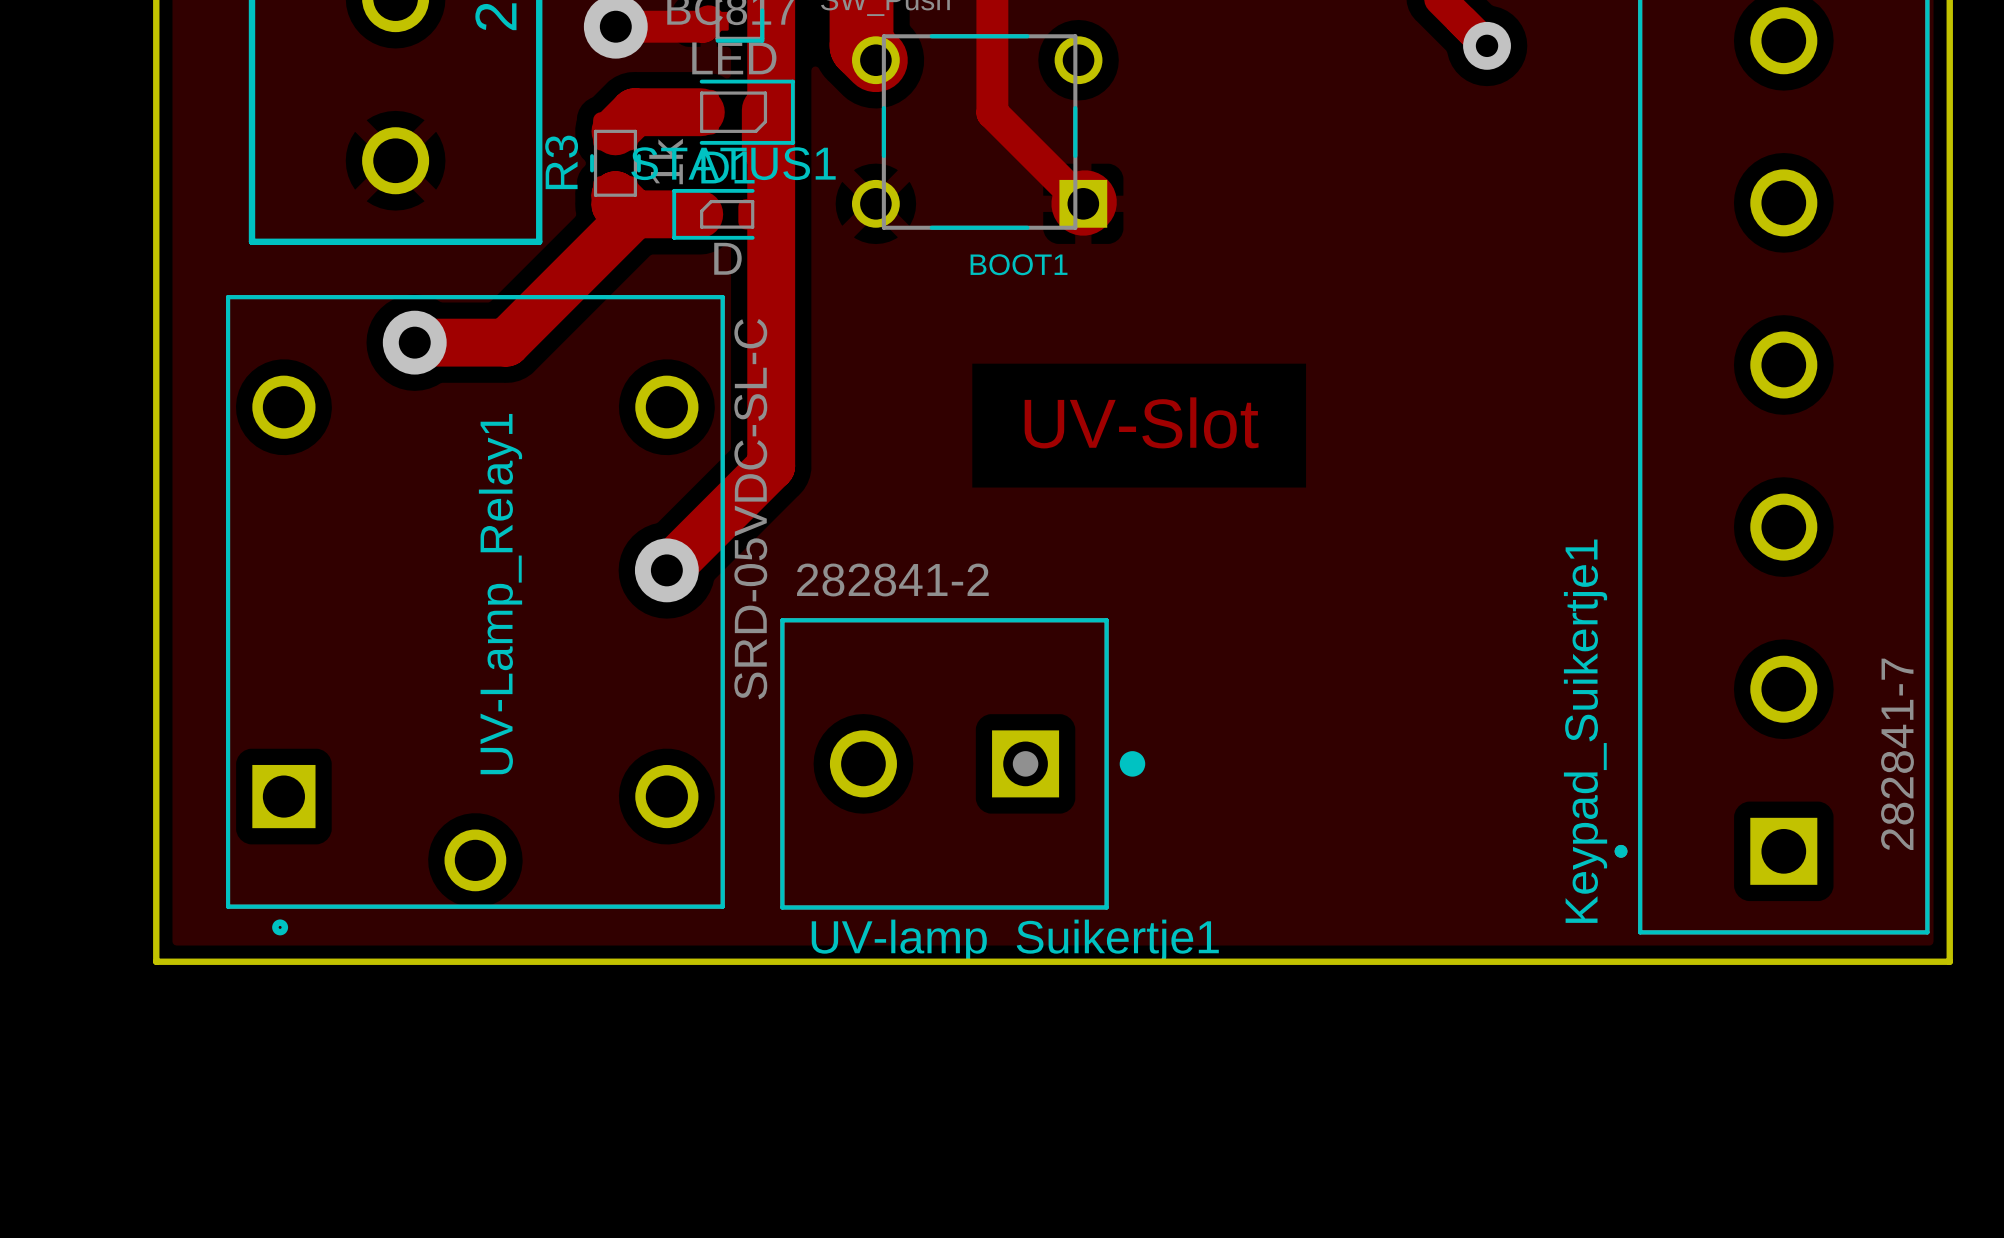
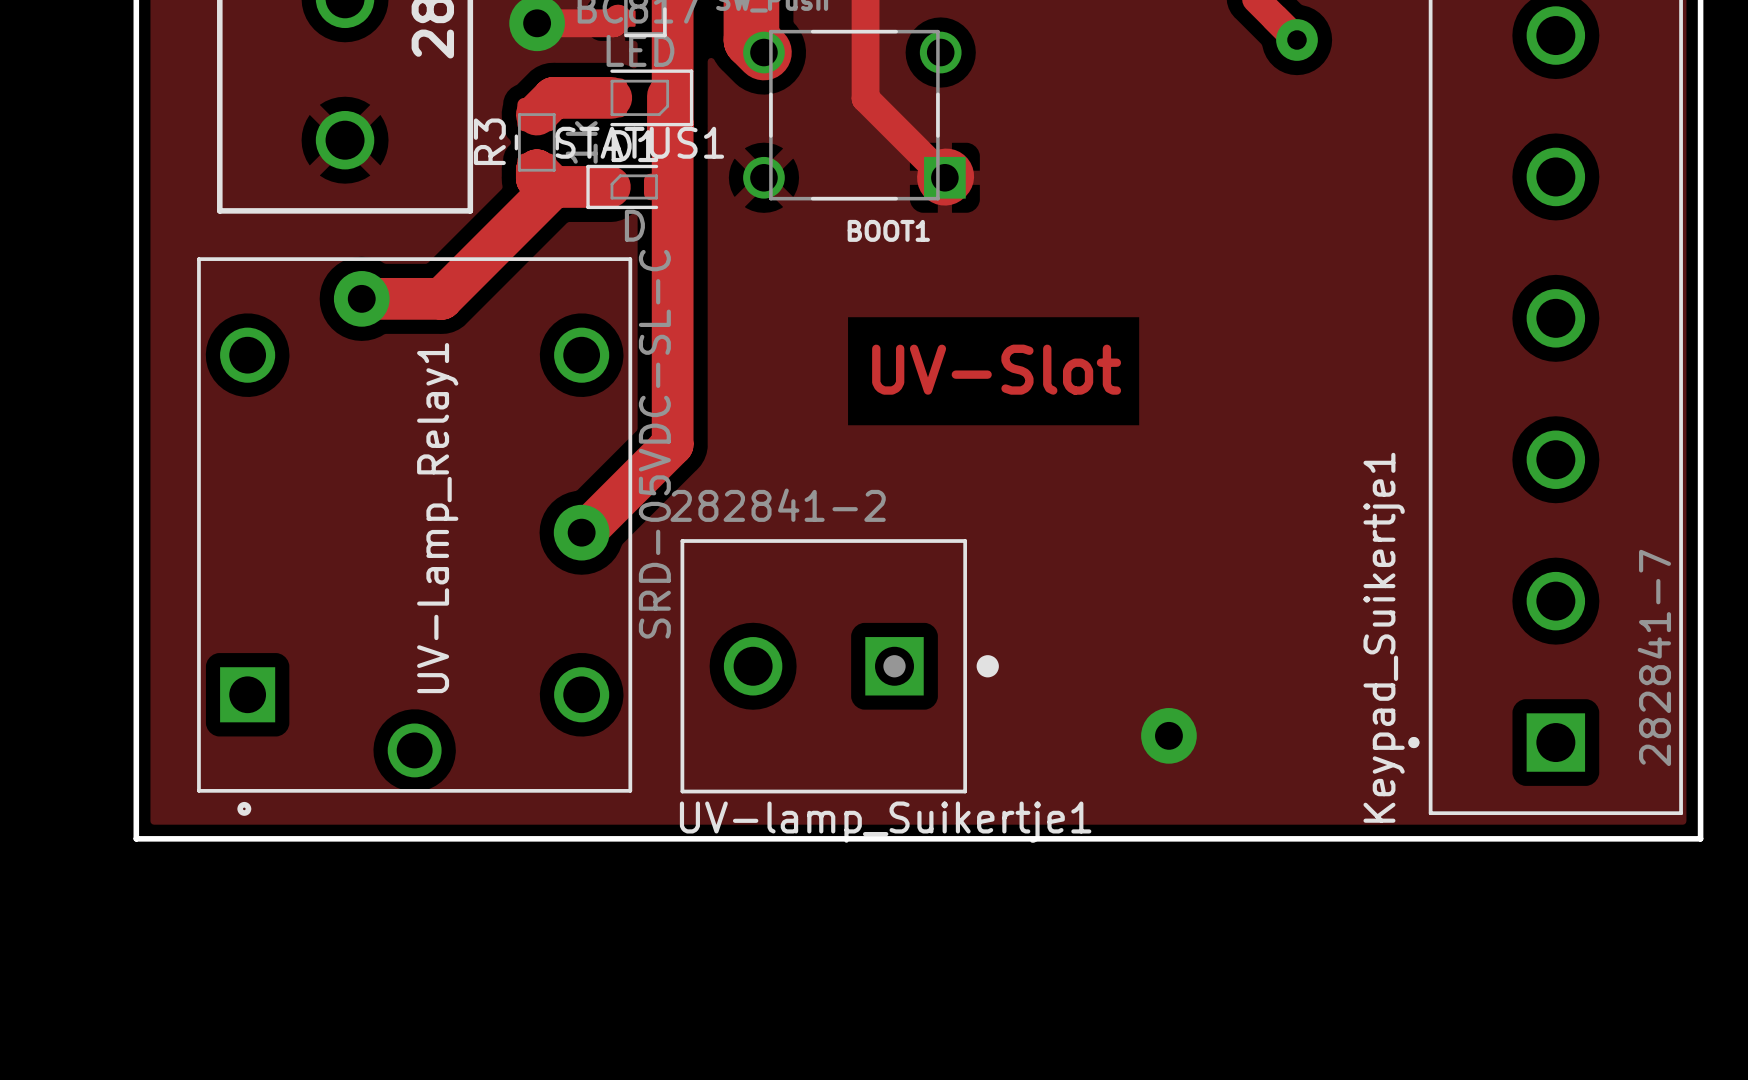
track: (771, 466) (666, 570) -> (672, 406) (672, 444) (584, 532) (581, 532)
via position: (666, 570) -> (581, 532)
via: none -> (1168, 735)

